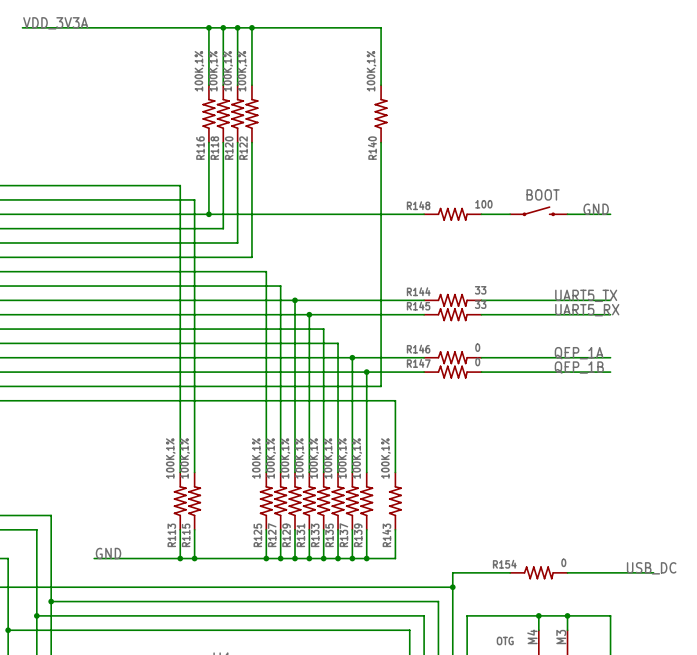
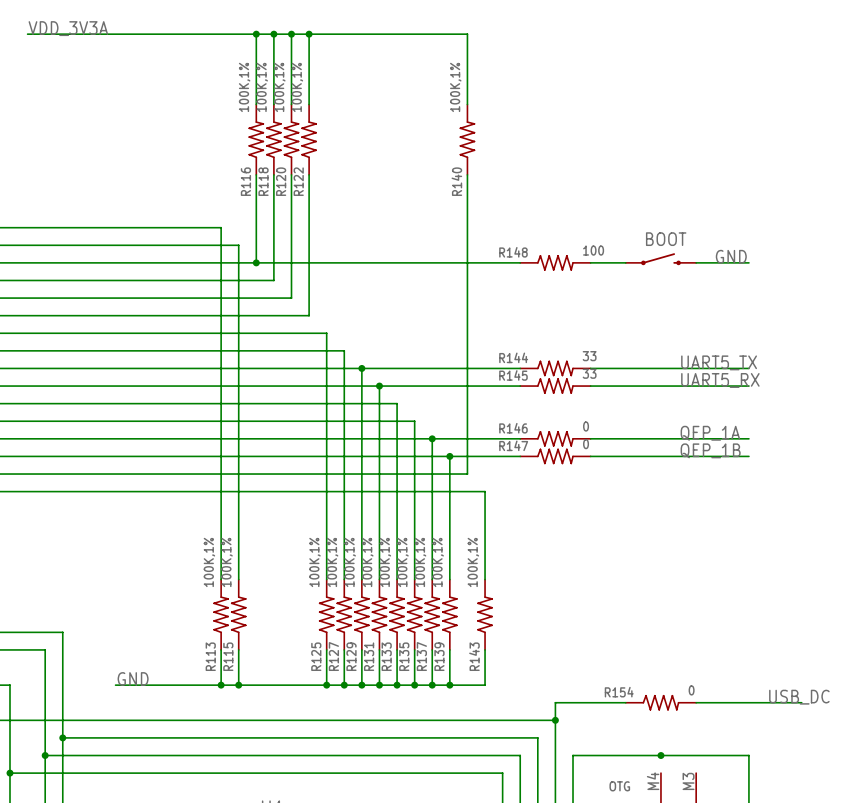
wire: (538, 615) (538, 630) -> none
wire: (567, 615) (567, 630) -> none
junction: (567, 615) -> none

